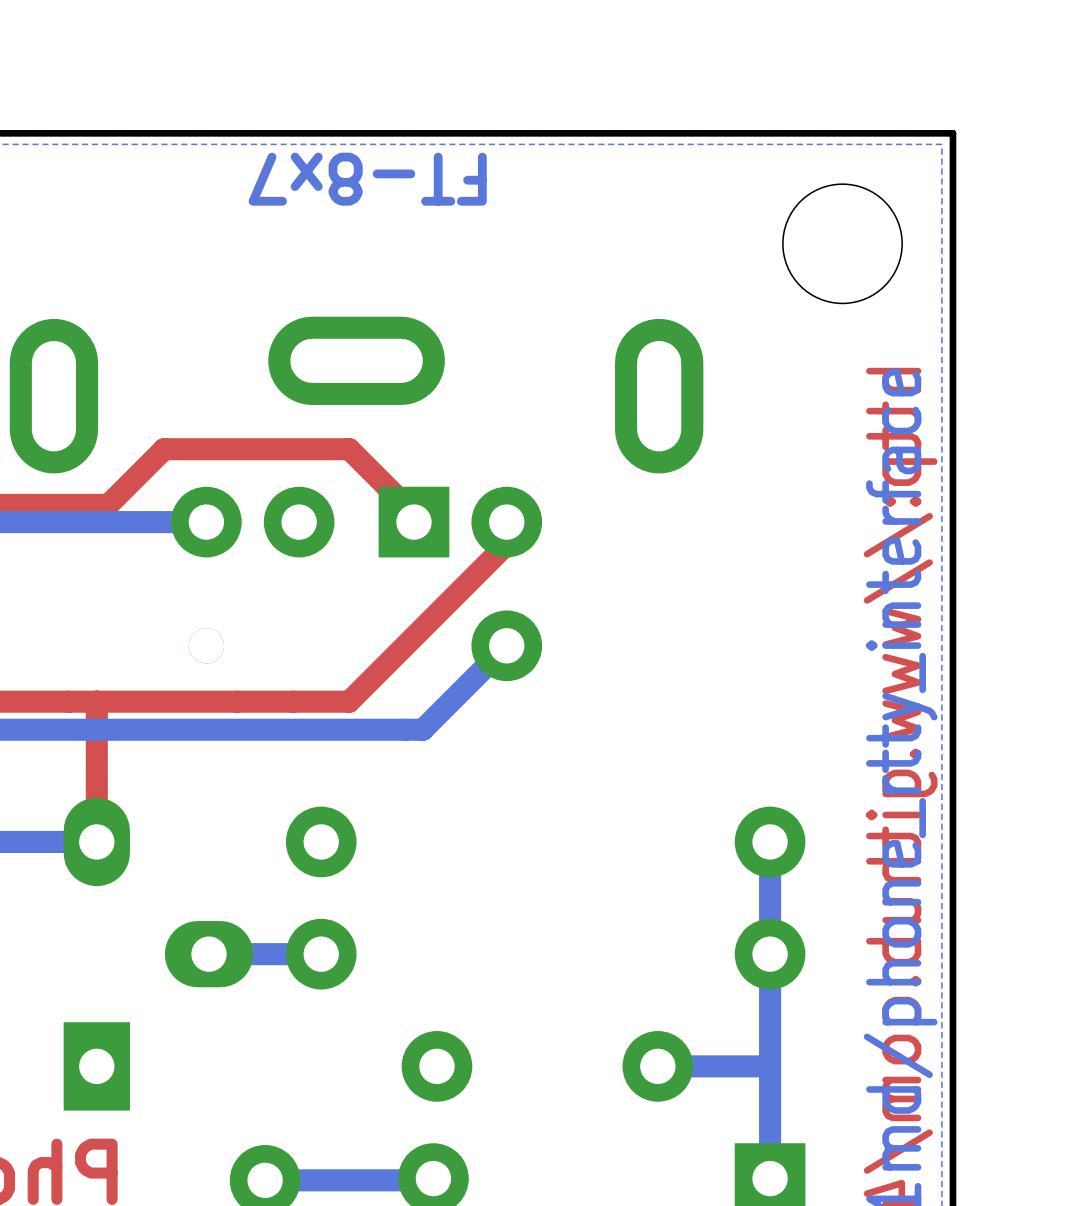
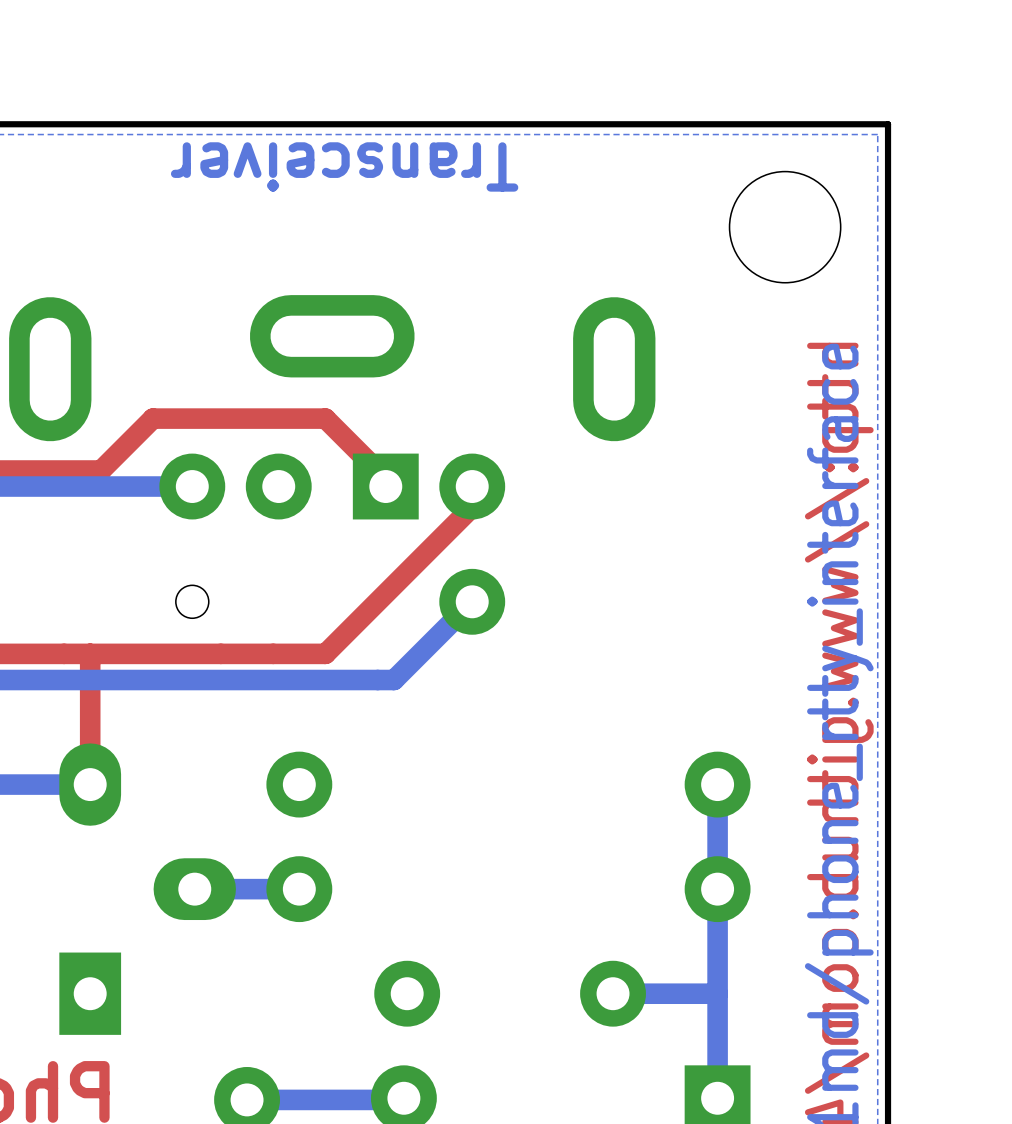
text: FT-8x7 (367, 179) -> Transceiver (344, 166)
part footprint: [9, 316, 704, 682] -> [9, 295, 656, 635]

